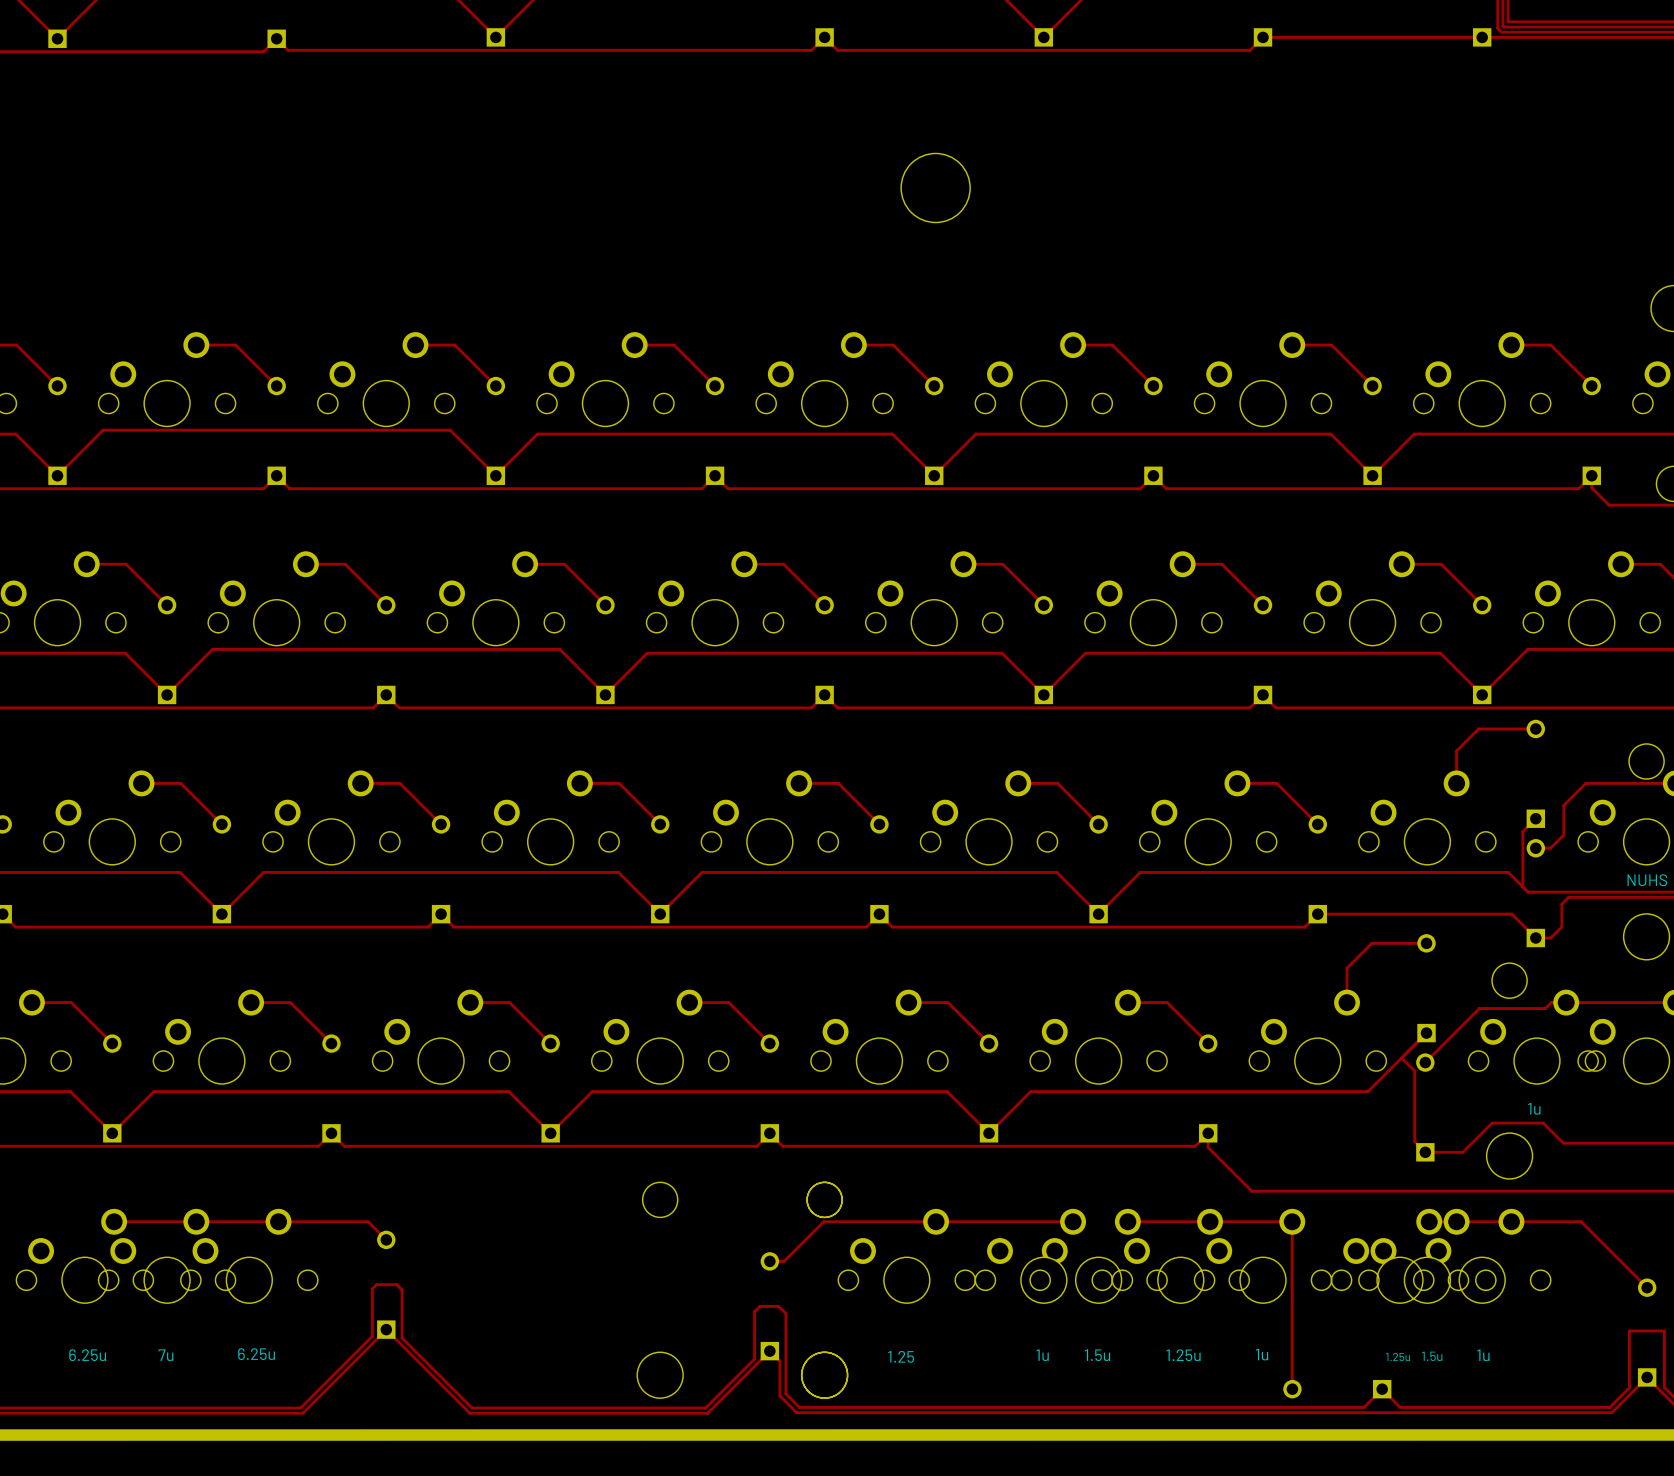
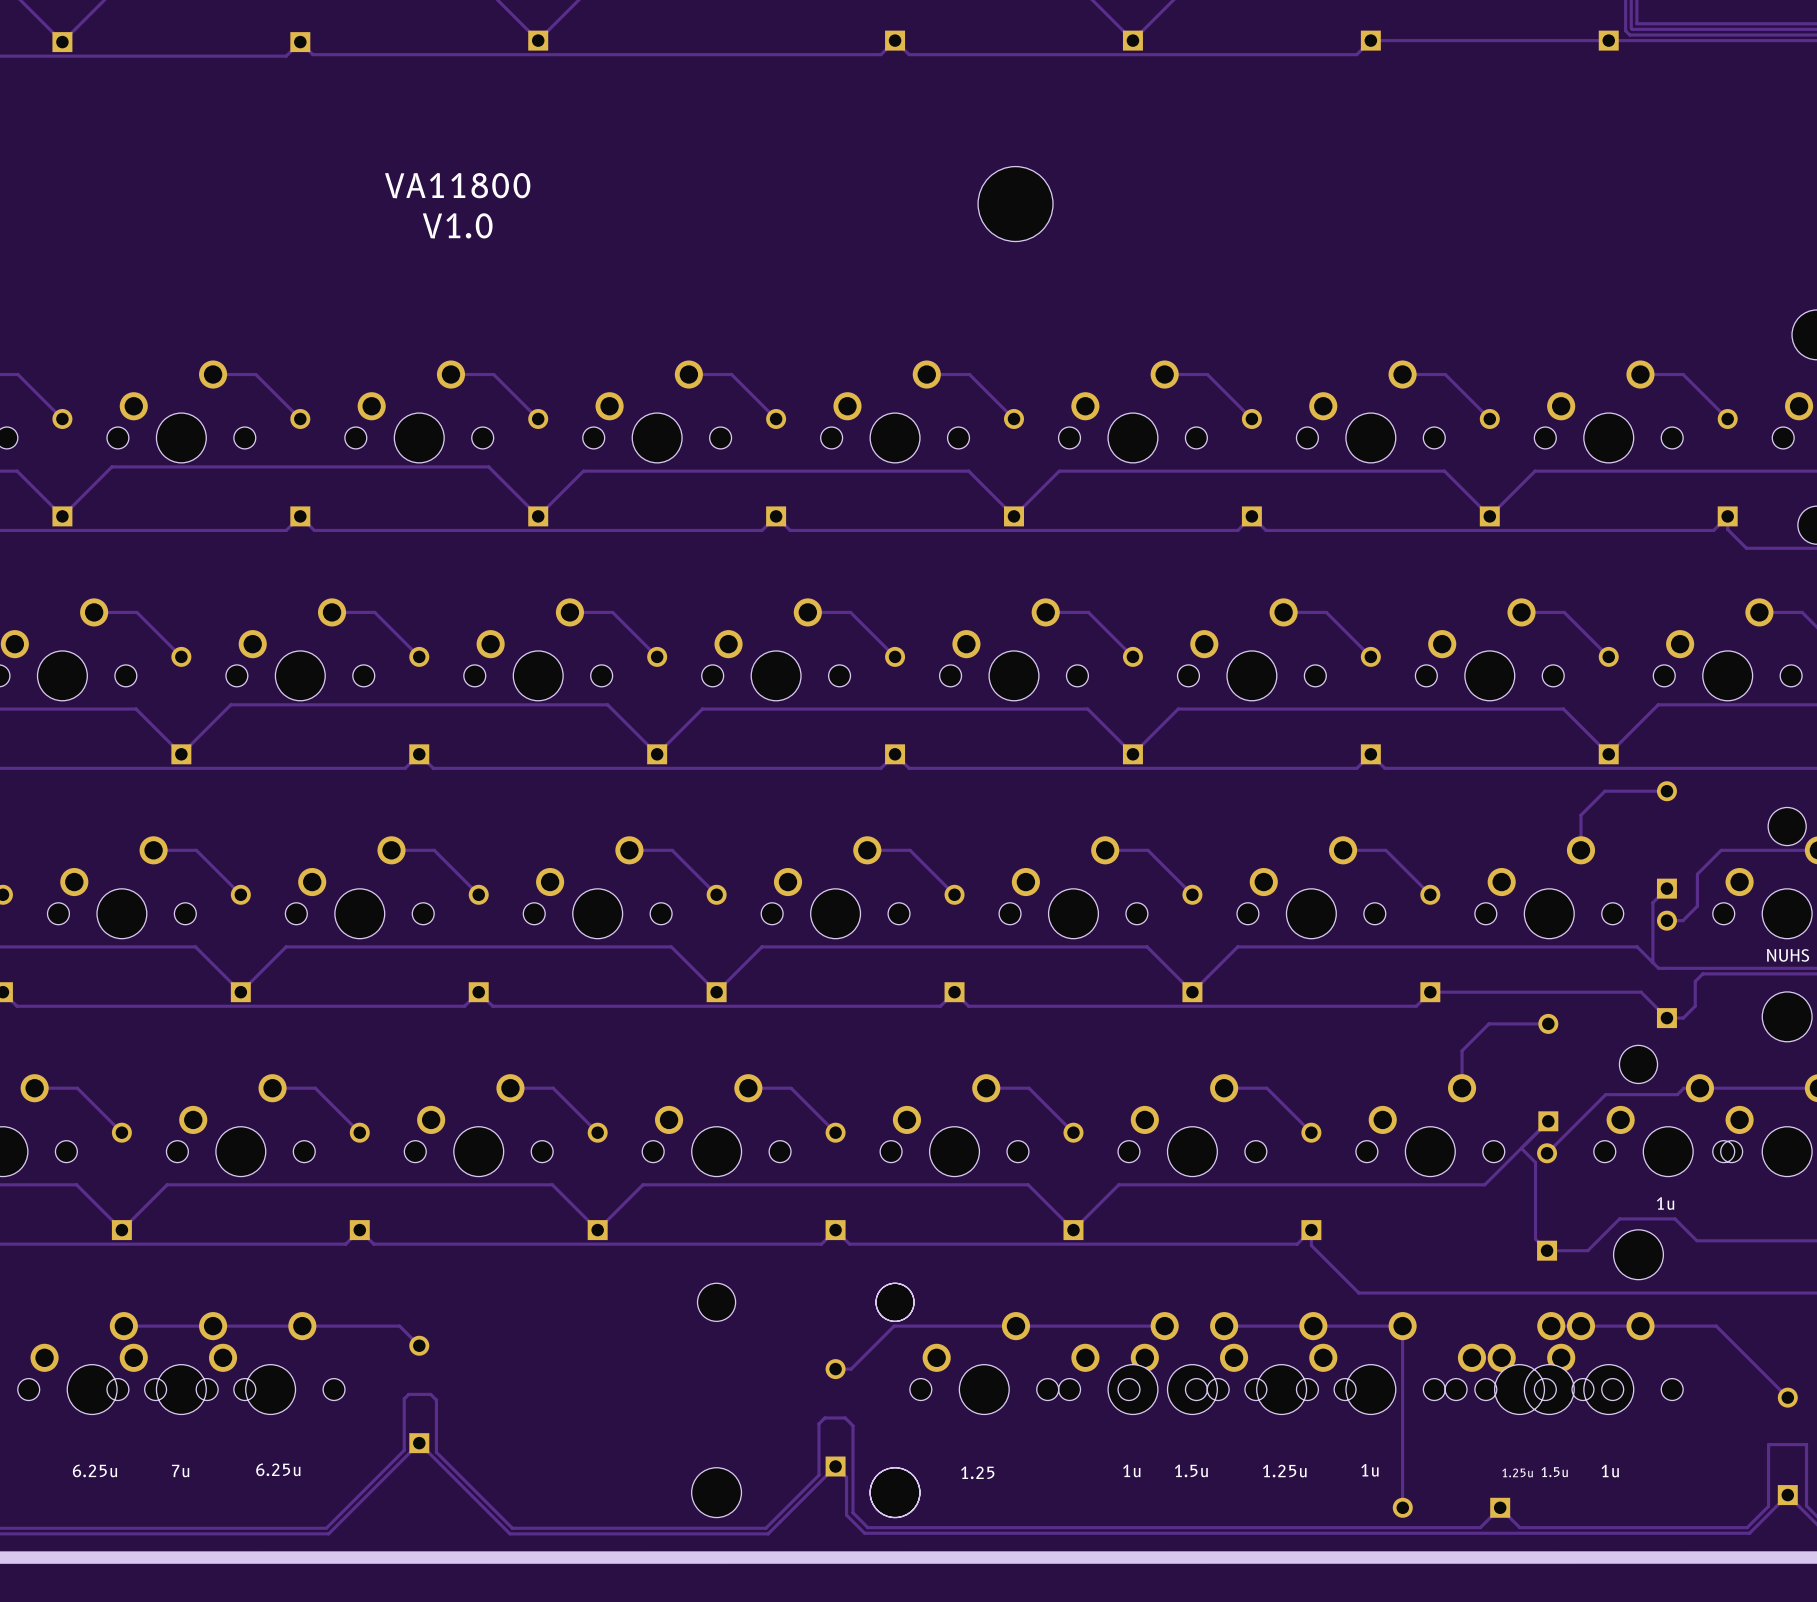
text: none -> VA11800 (457, 185)
text: none -> V1.0 (457, 225)

